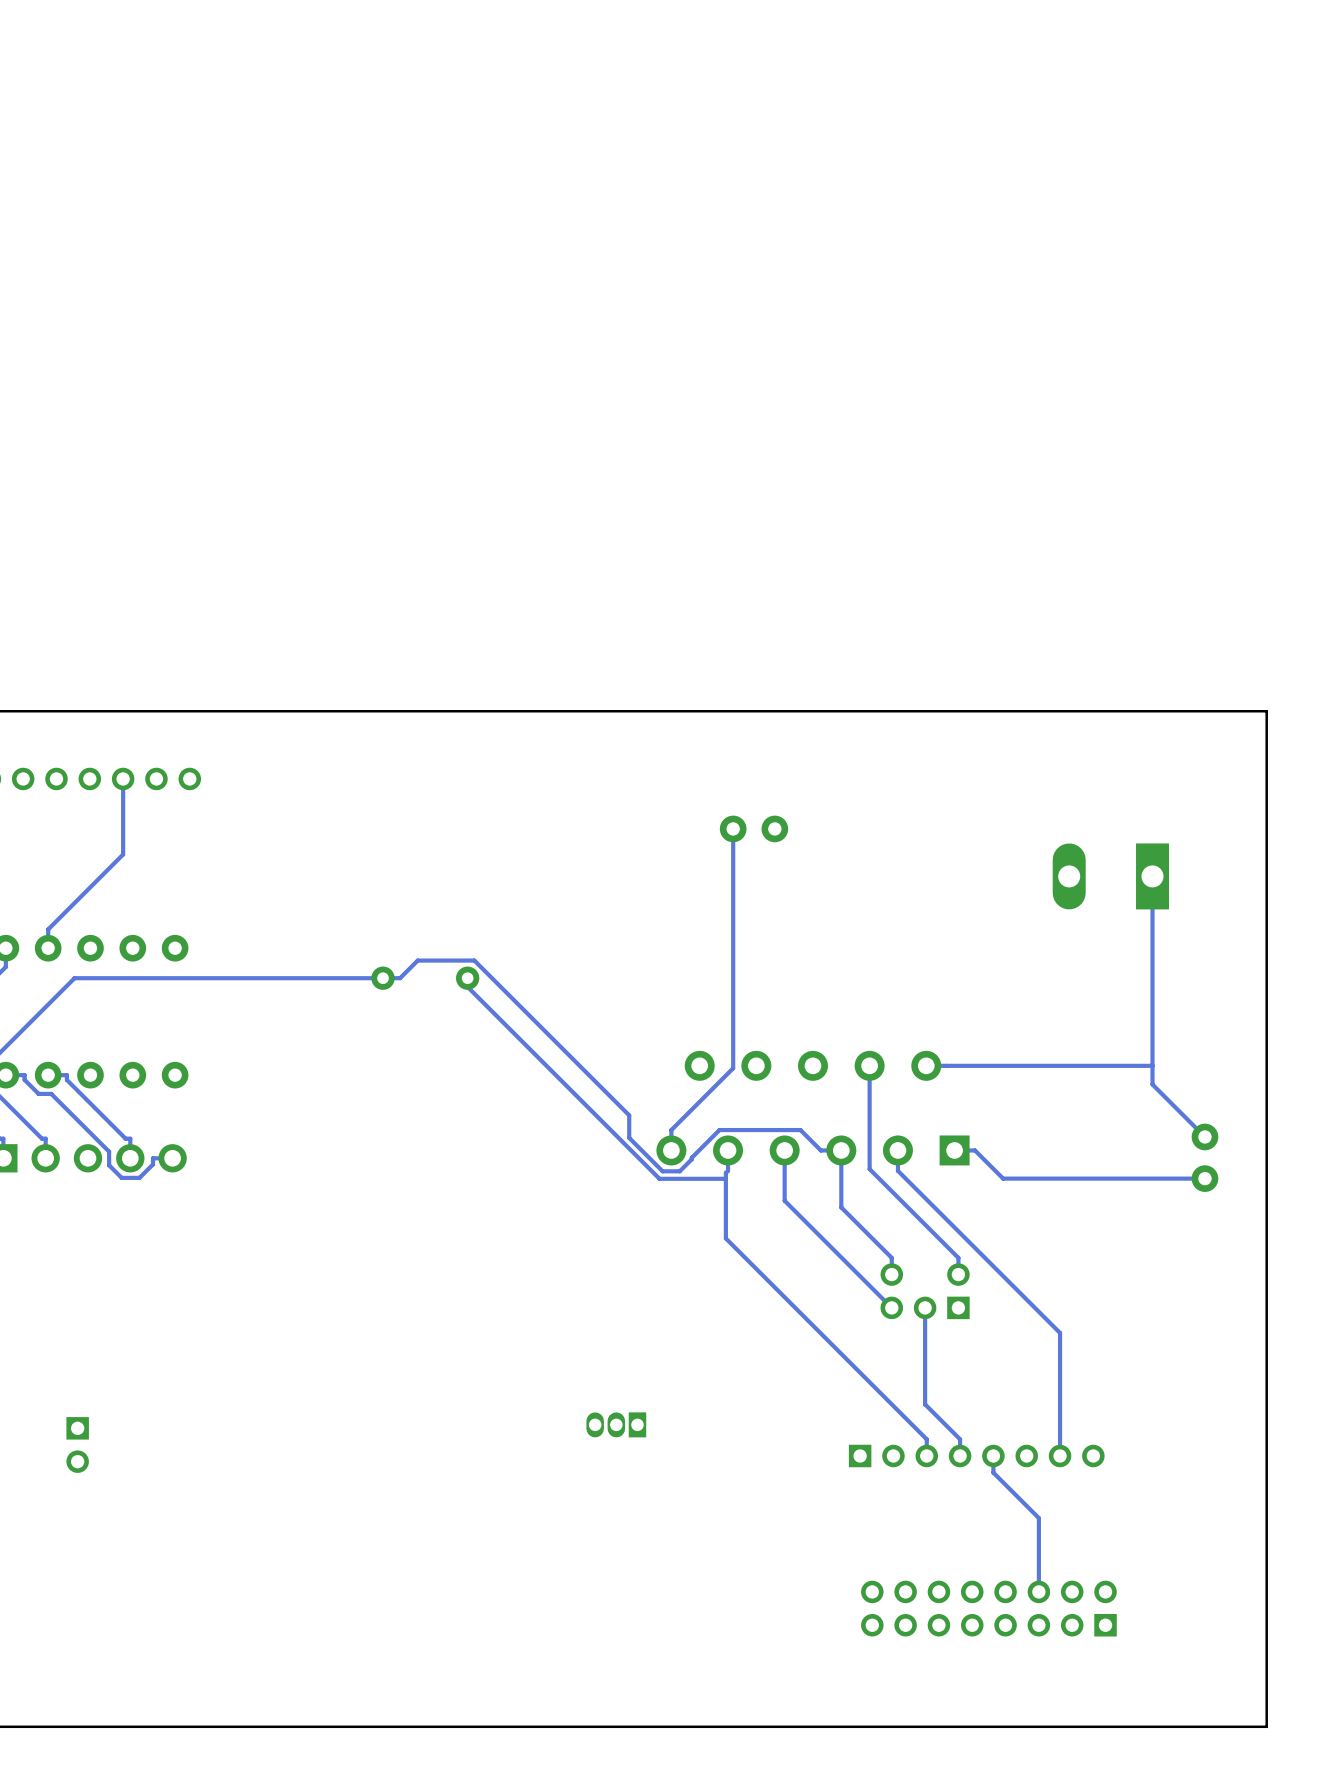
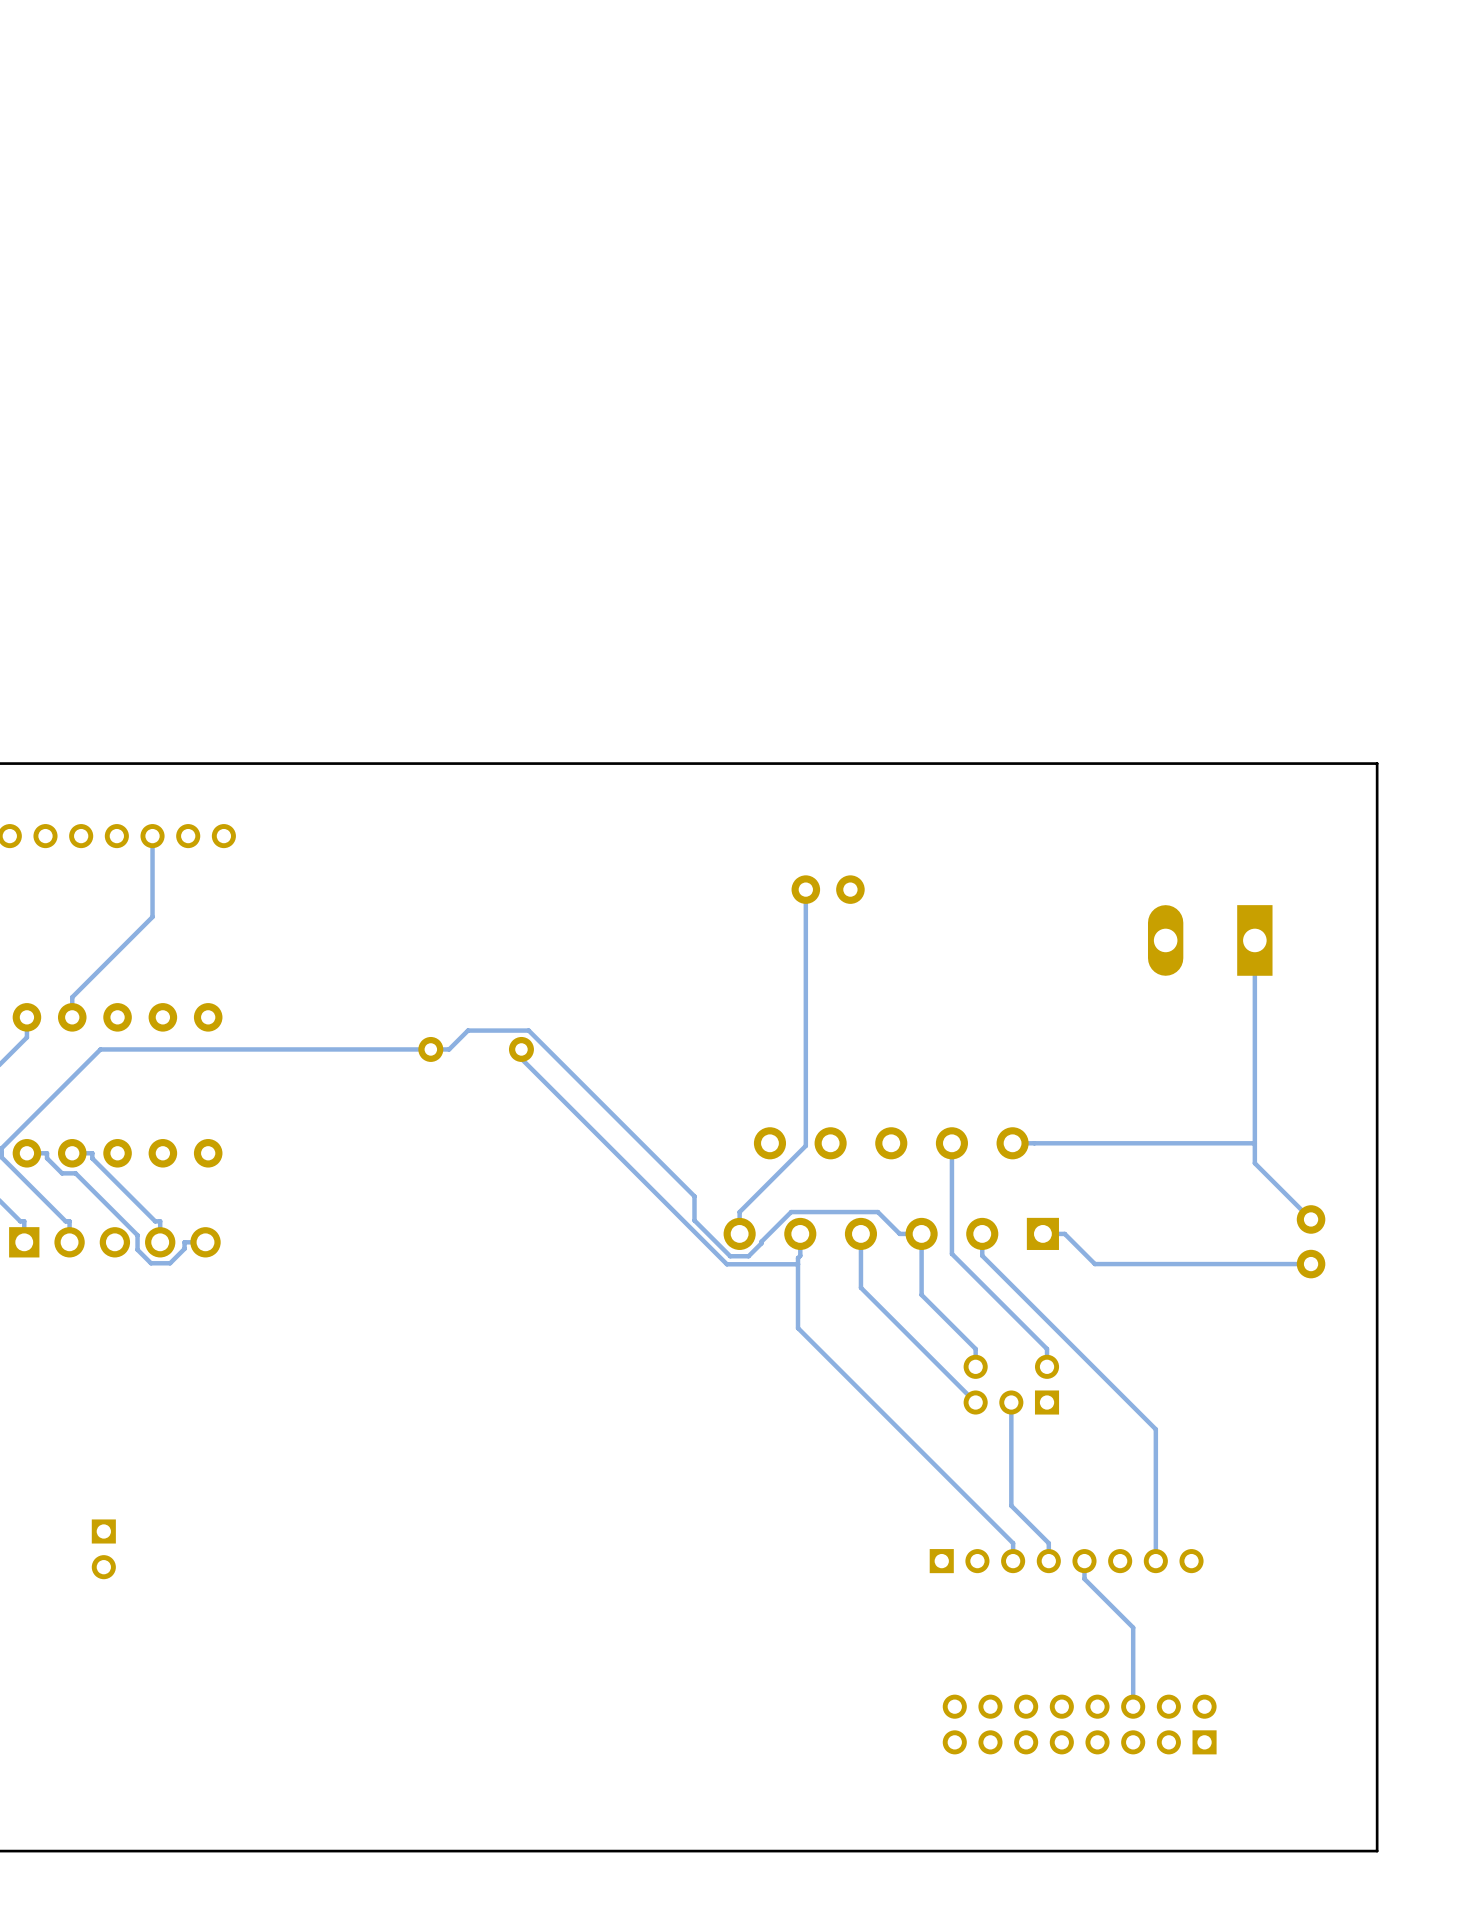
part: (616, 1424) -> none

